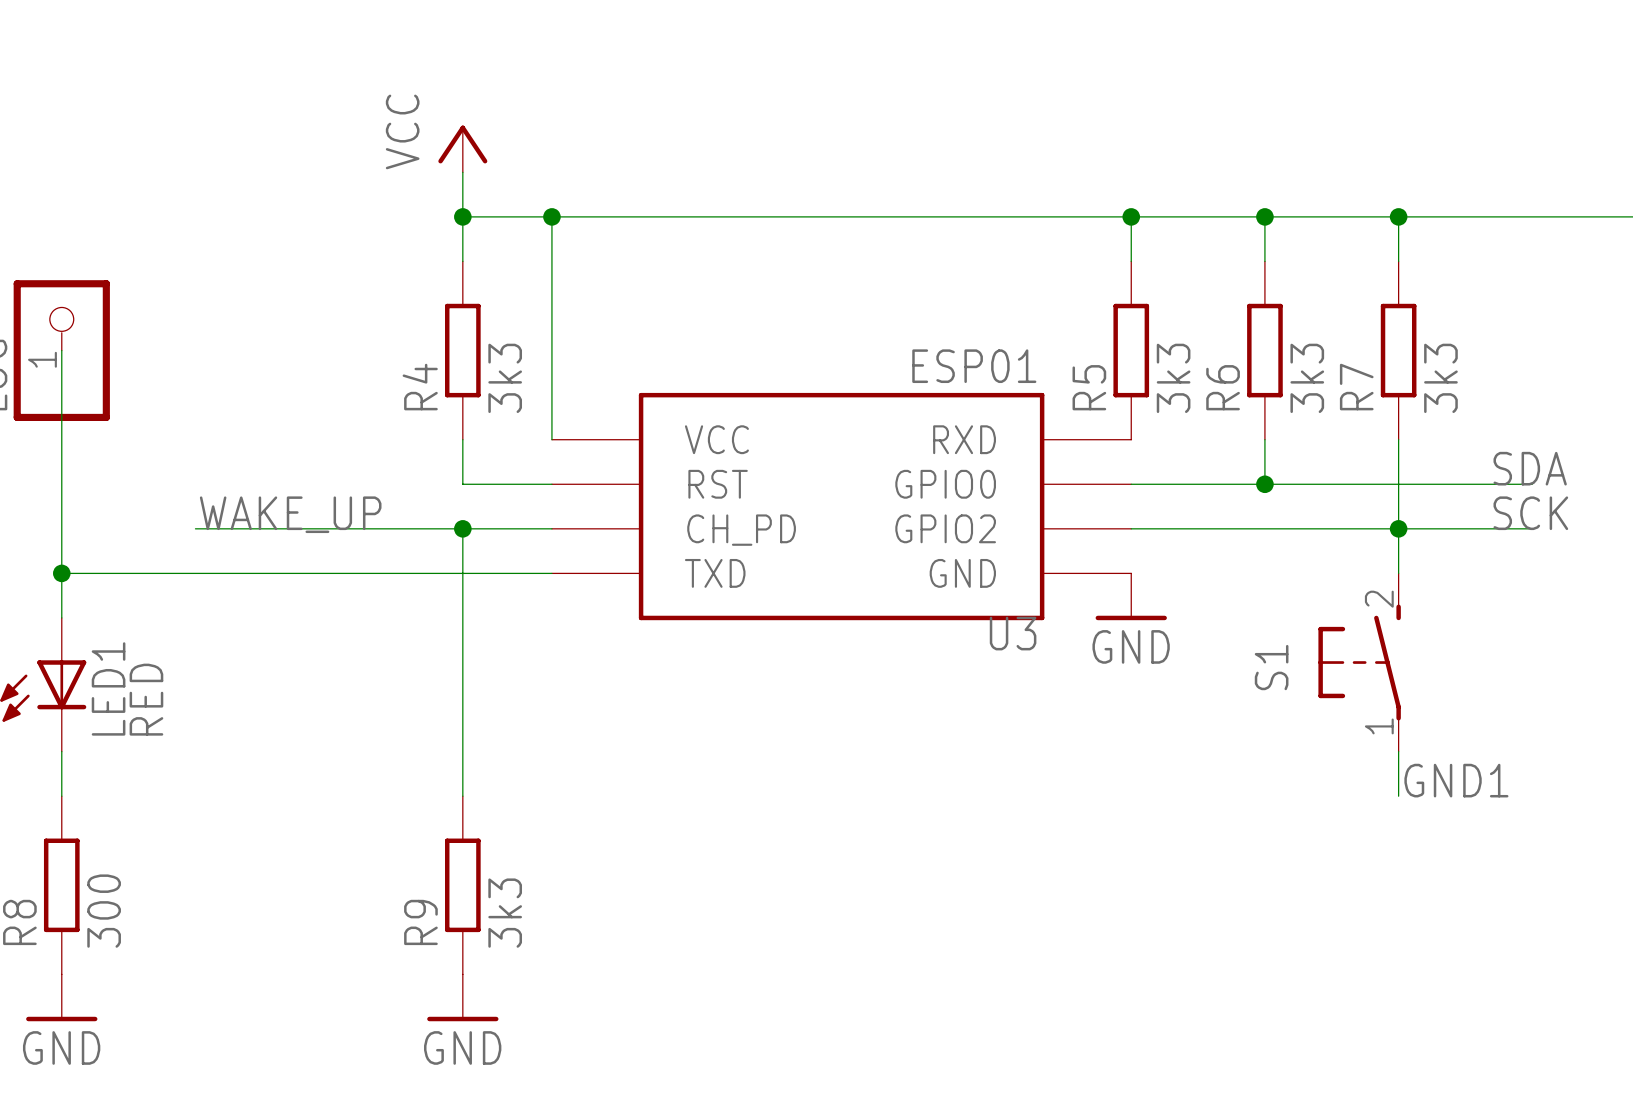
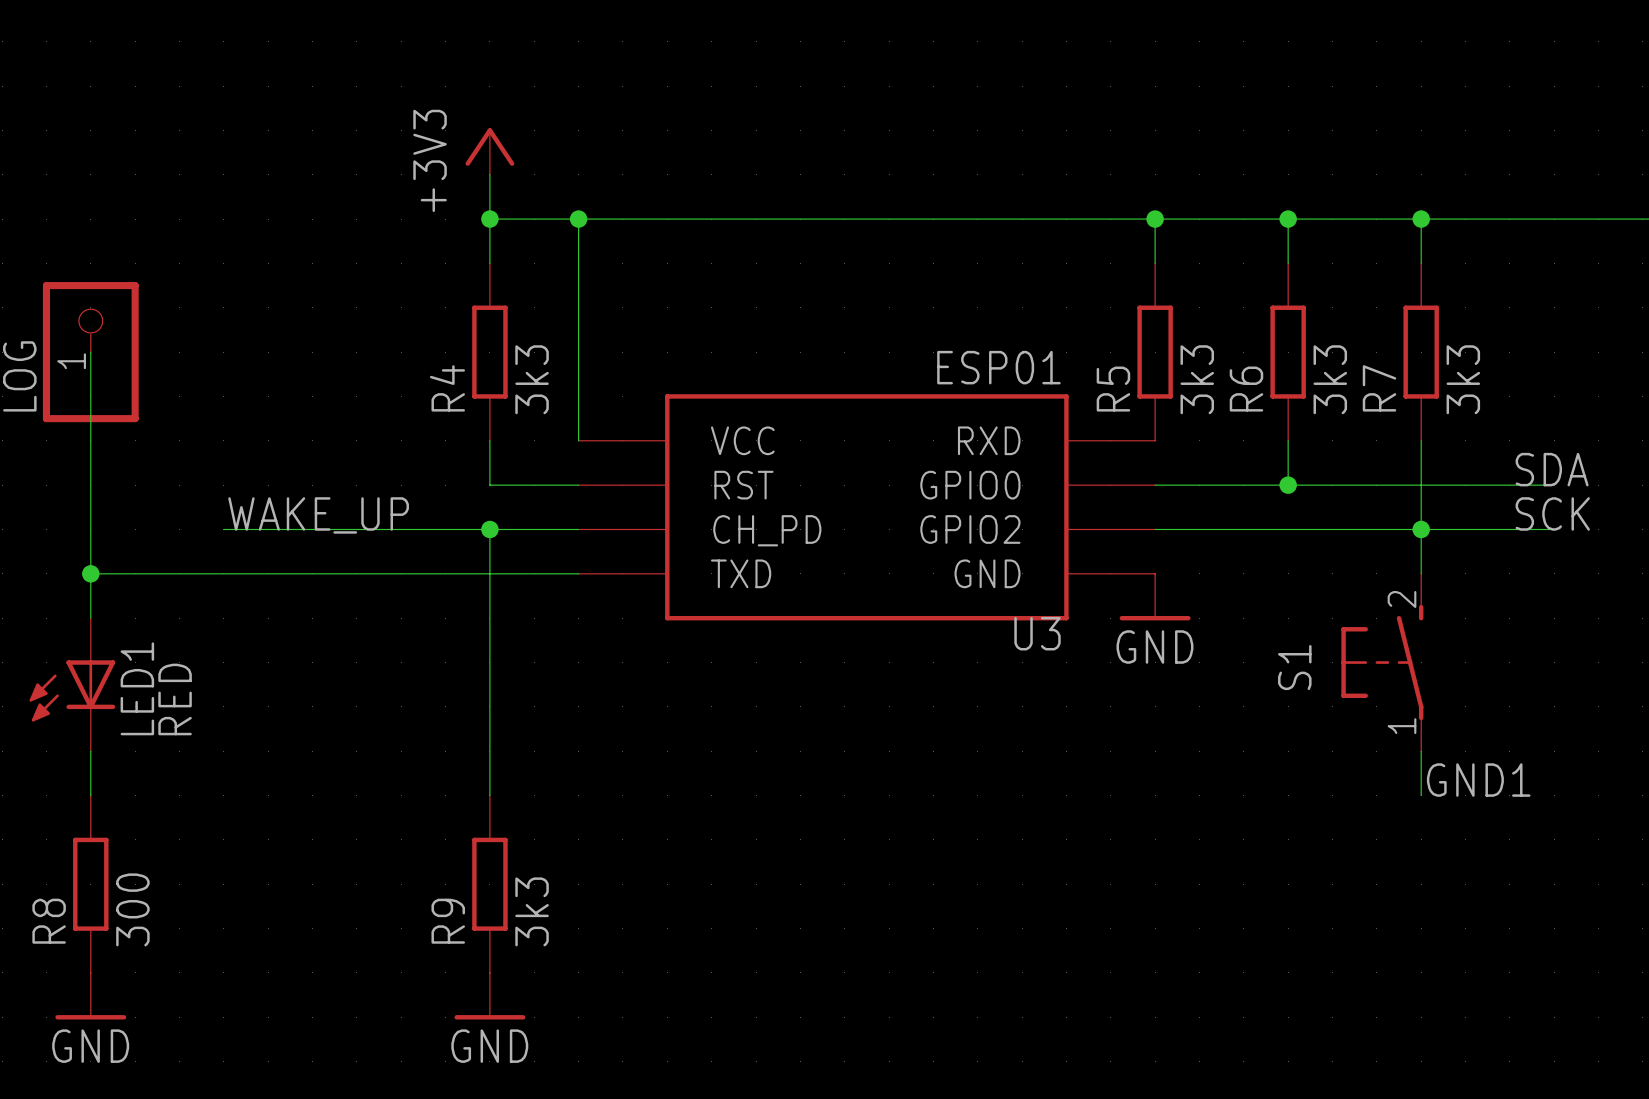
power symbol: VCC (462, 148) -> +3V3 (489, 151)

